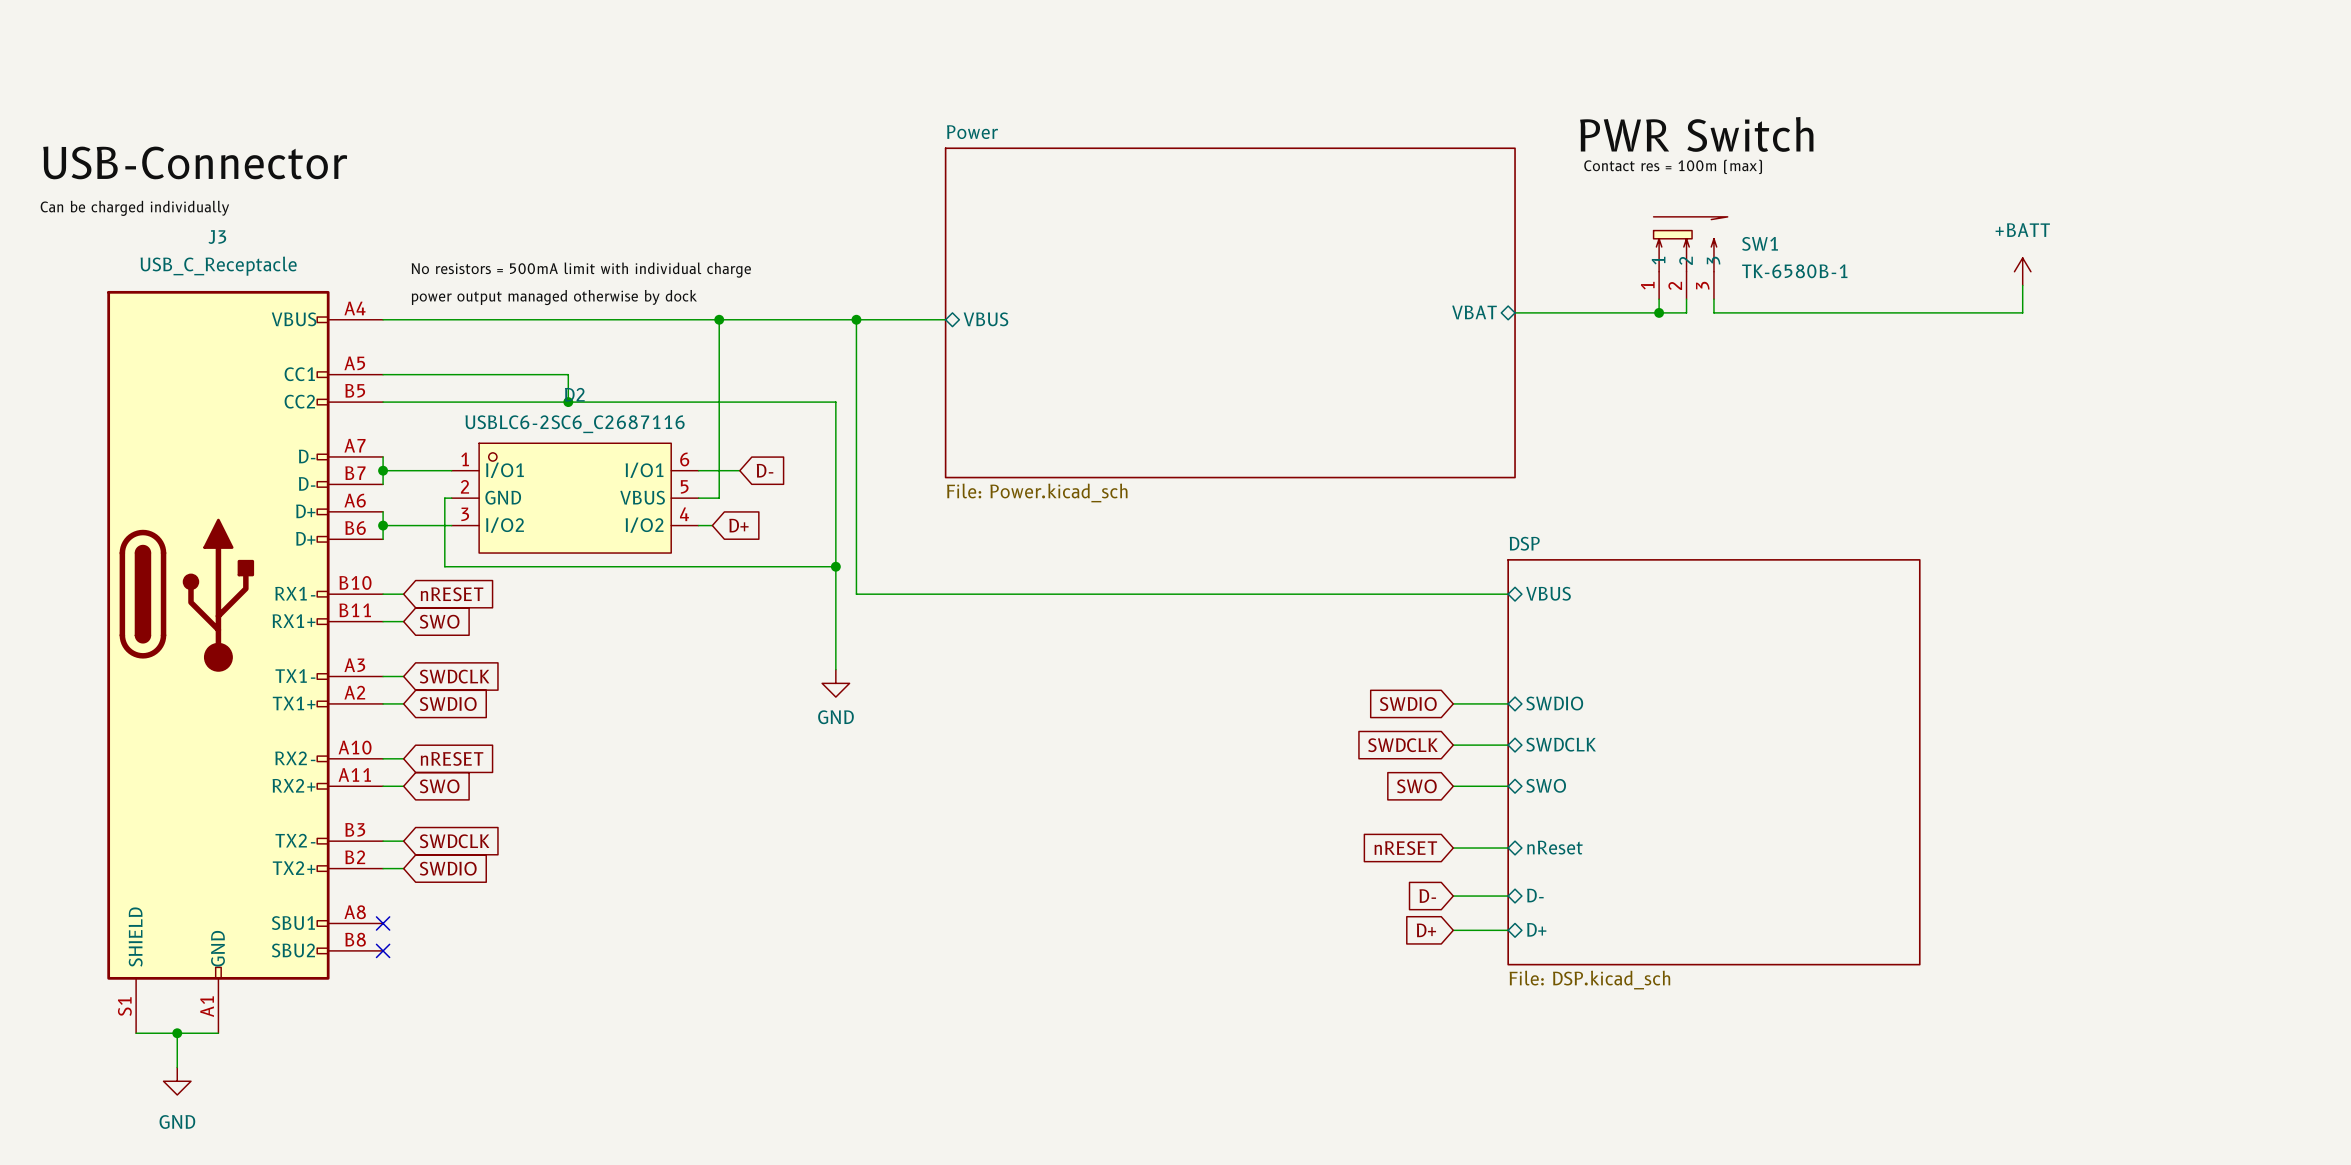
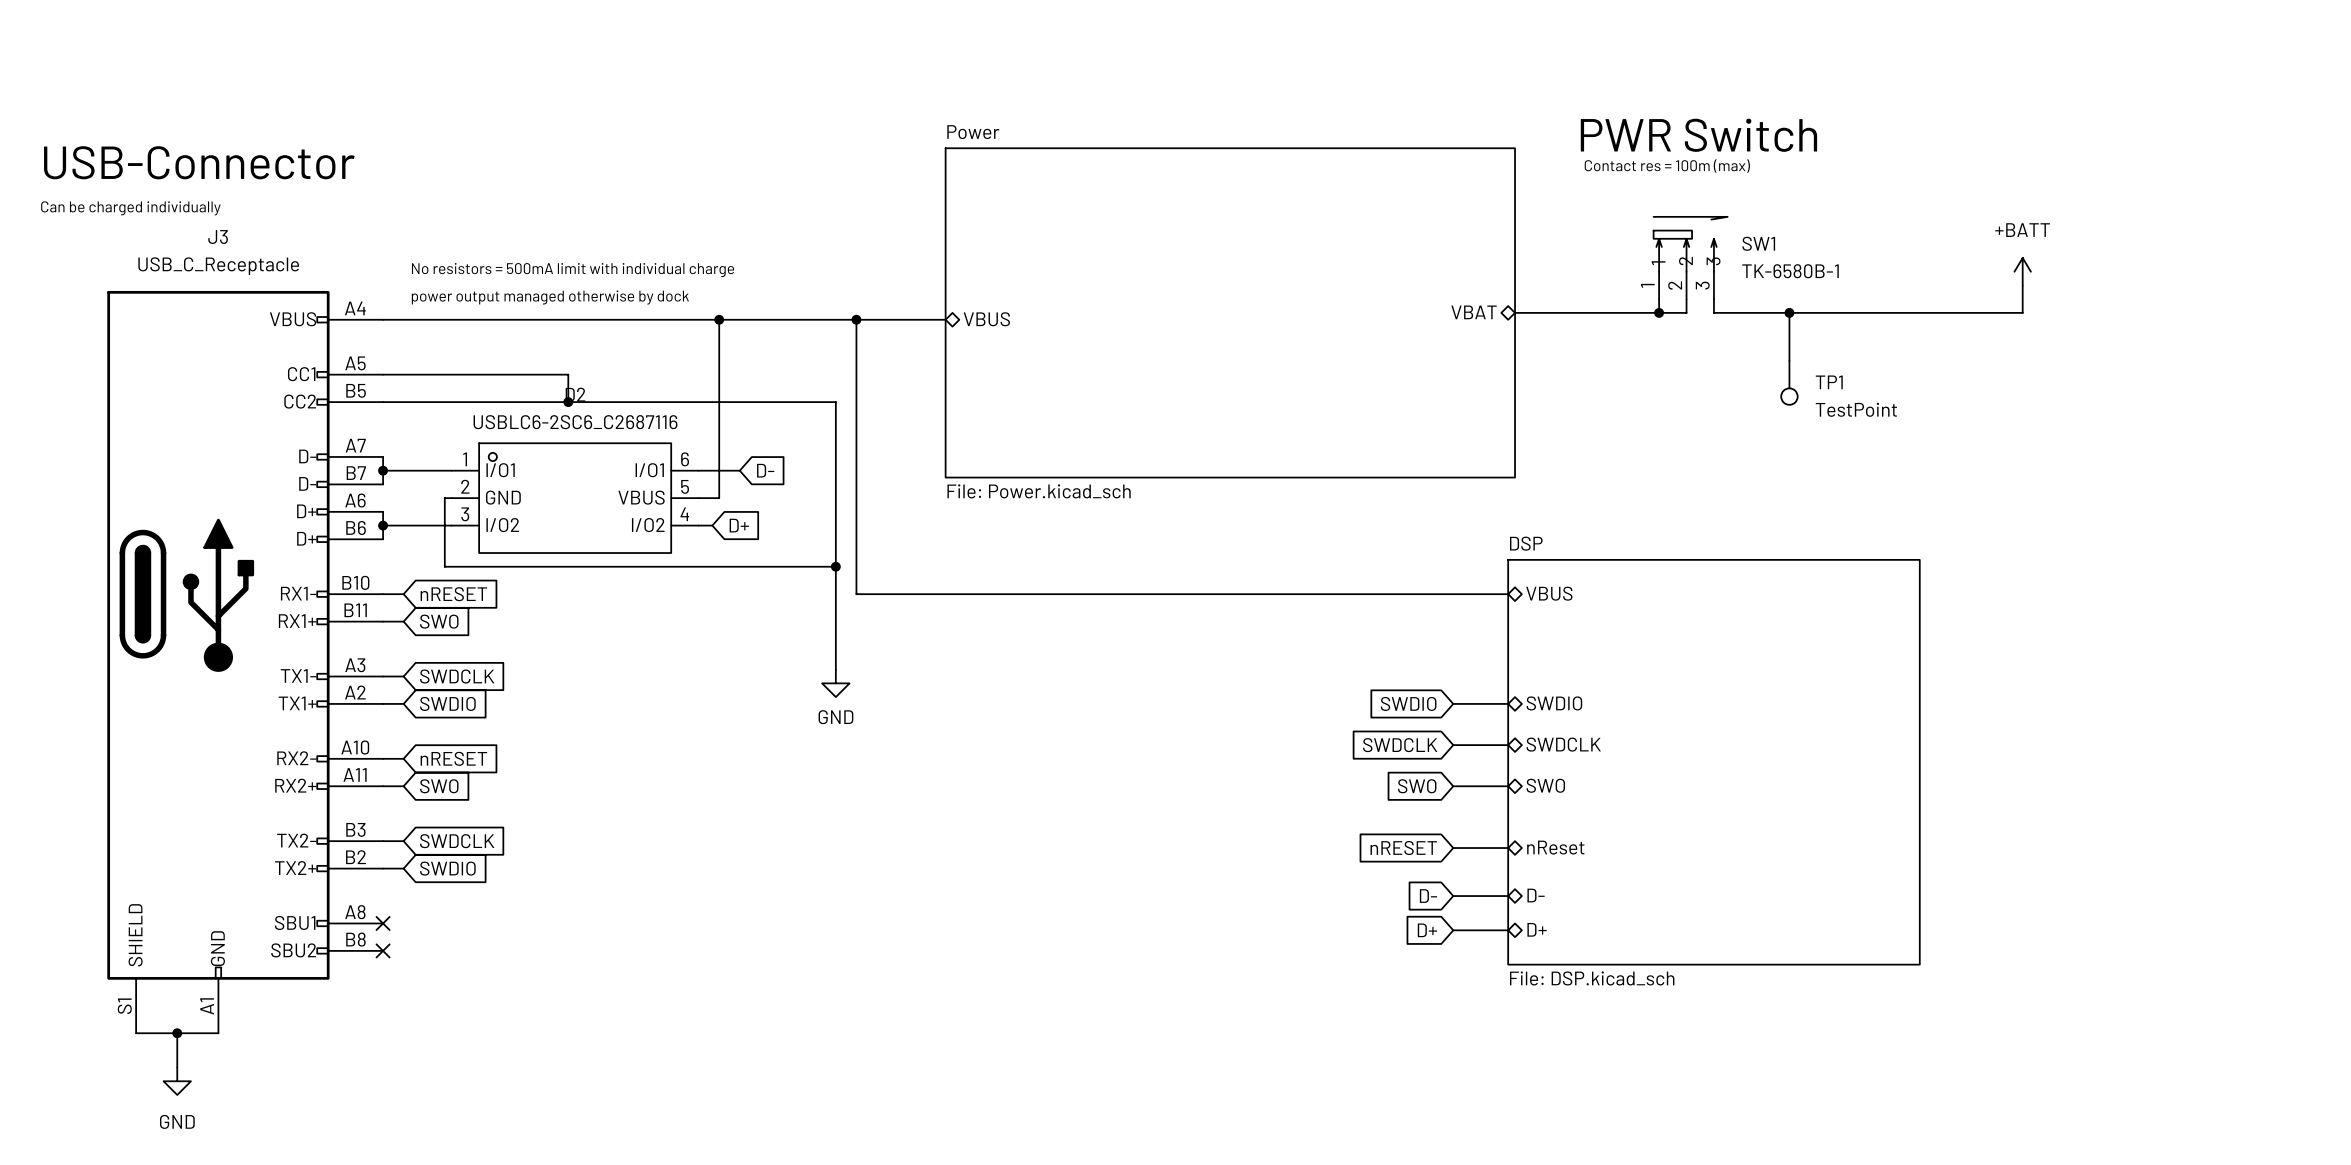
wire: none -> (1789, 312) (1789, 360)
junction: none -> (1789, 312)
TP1: none -> TestPoint (1789, 382)

